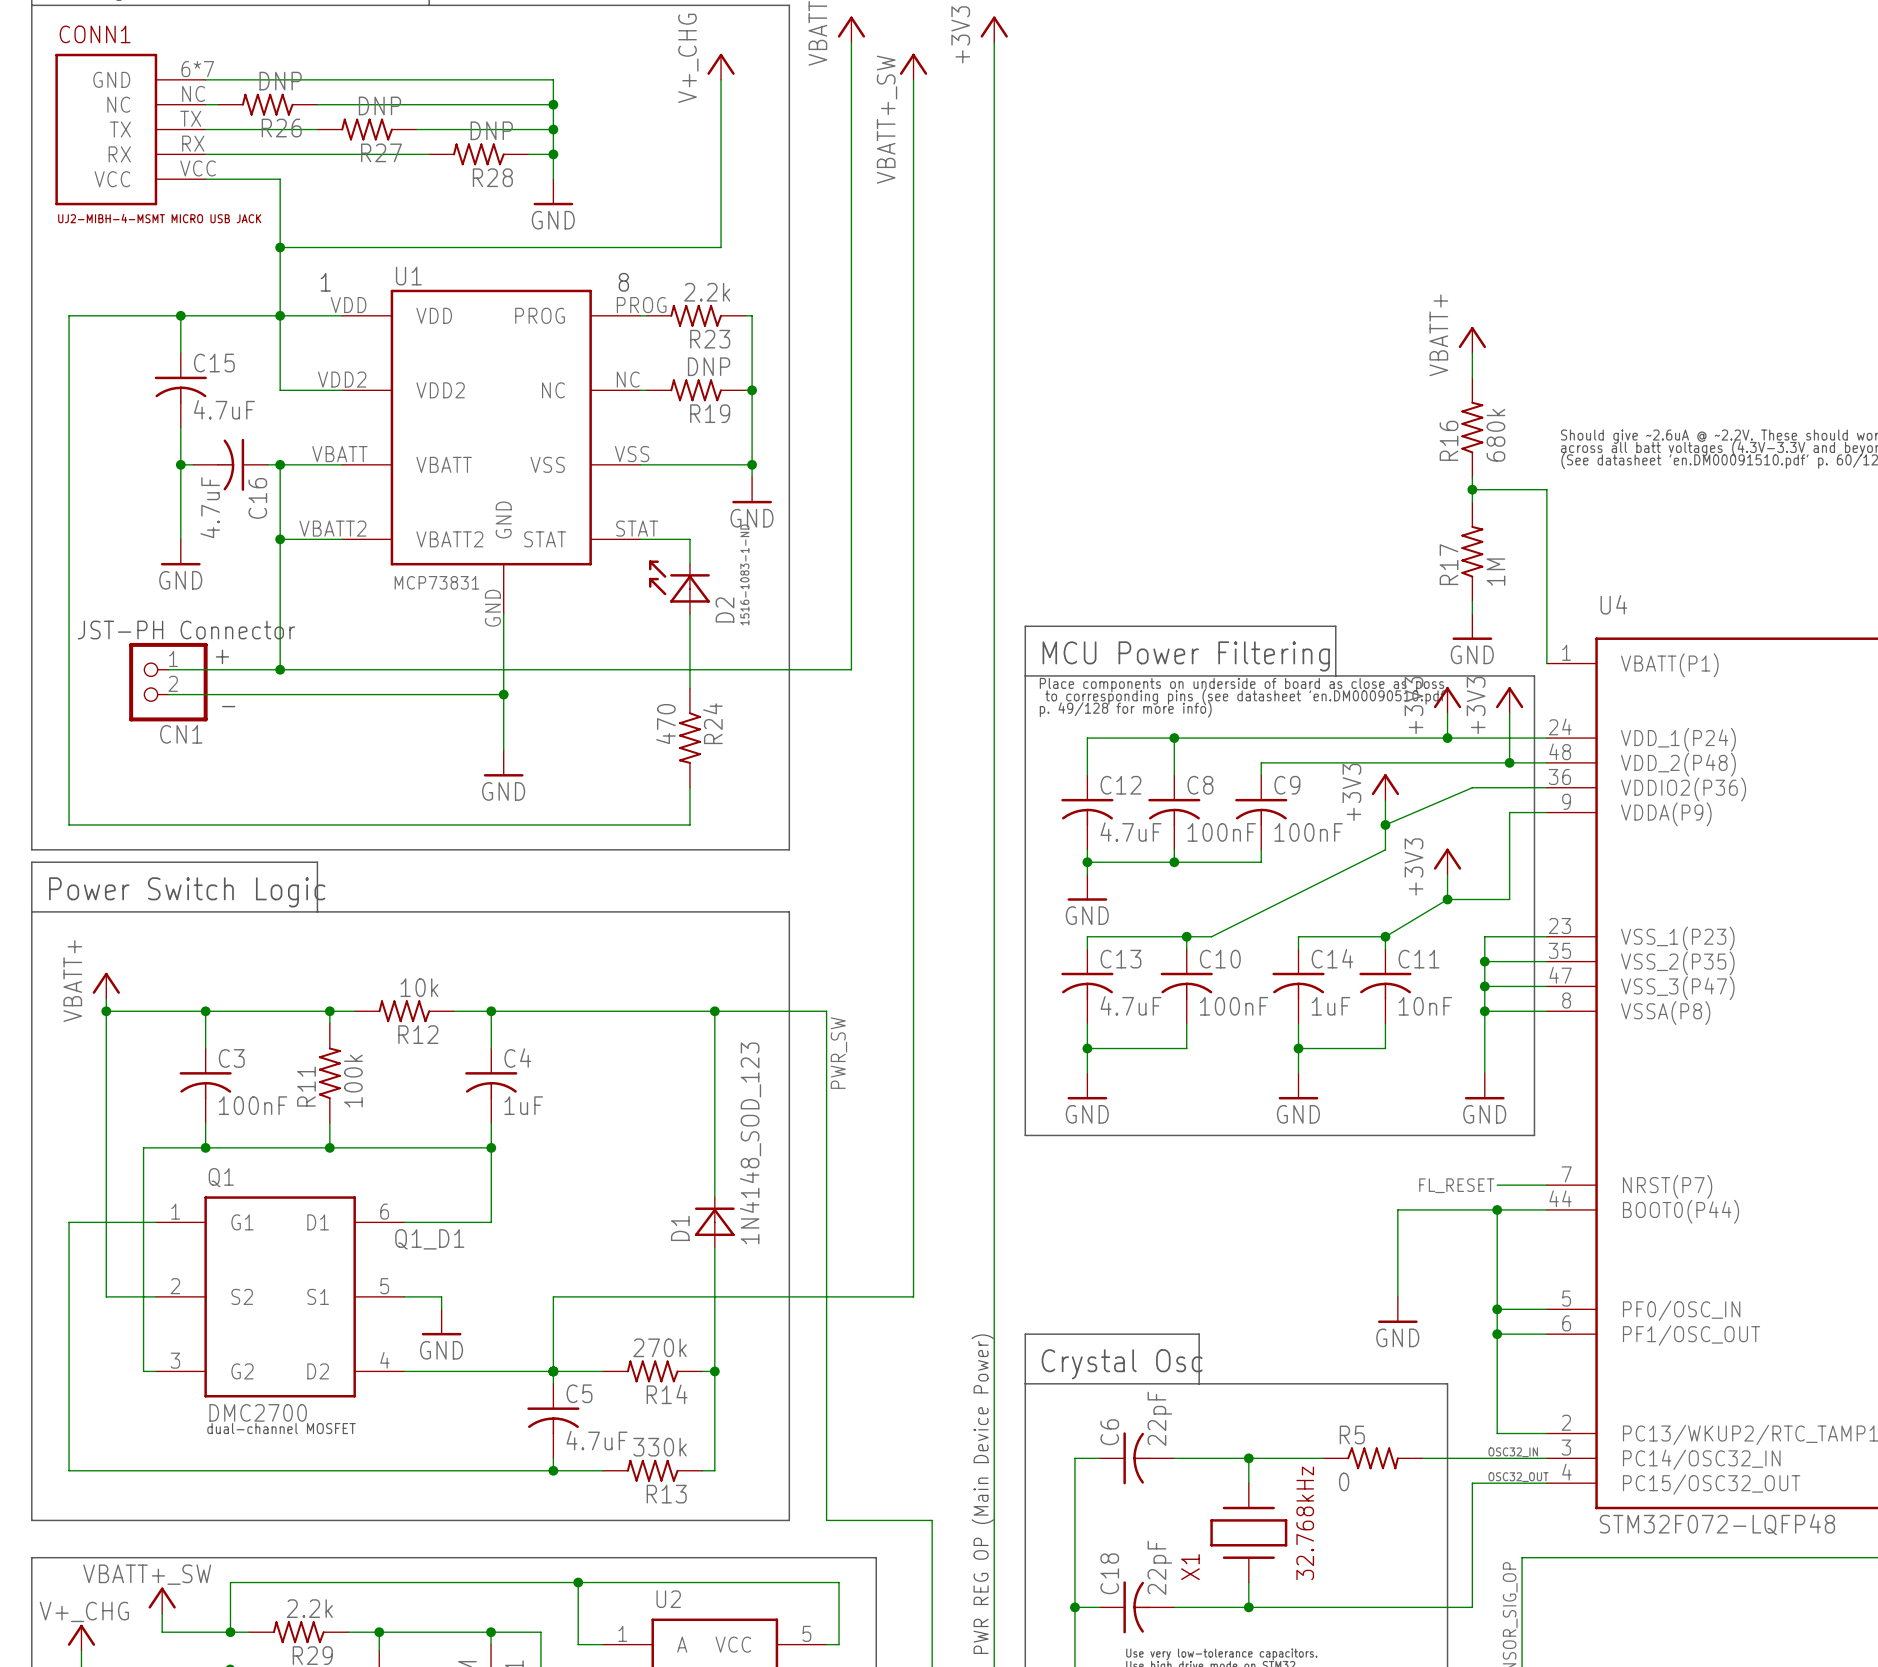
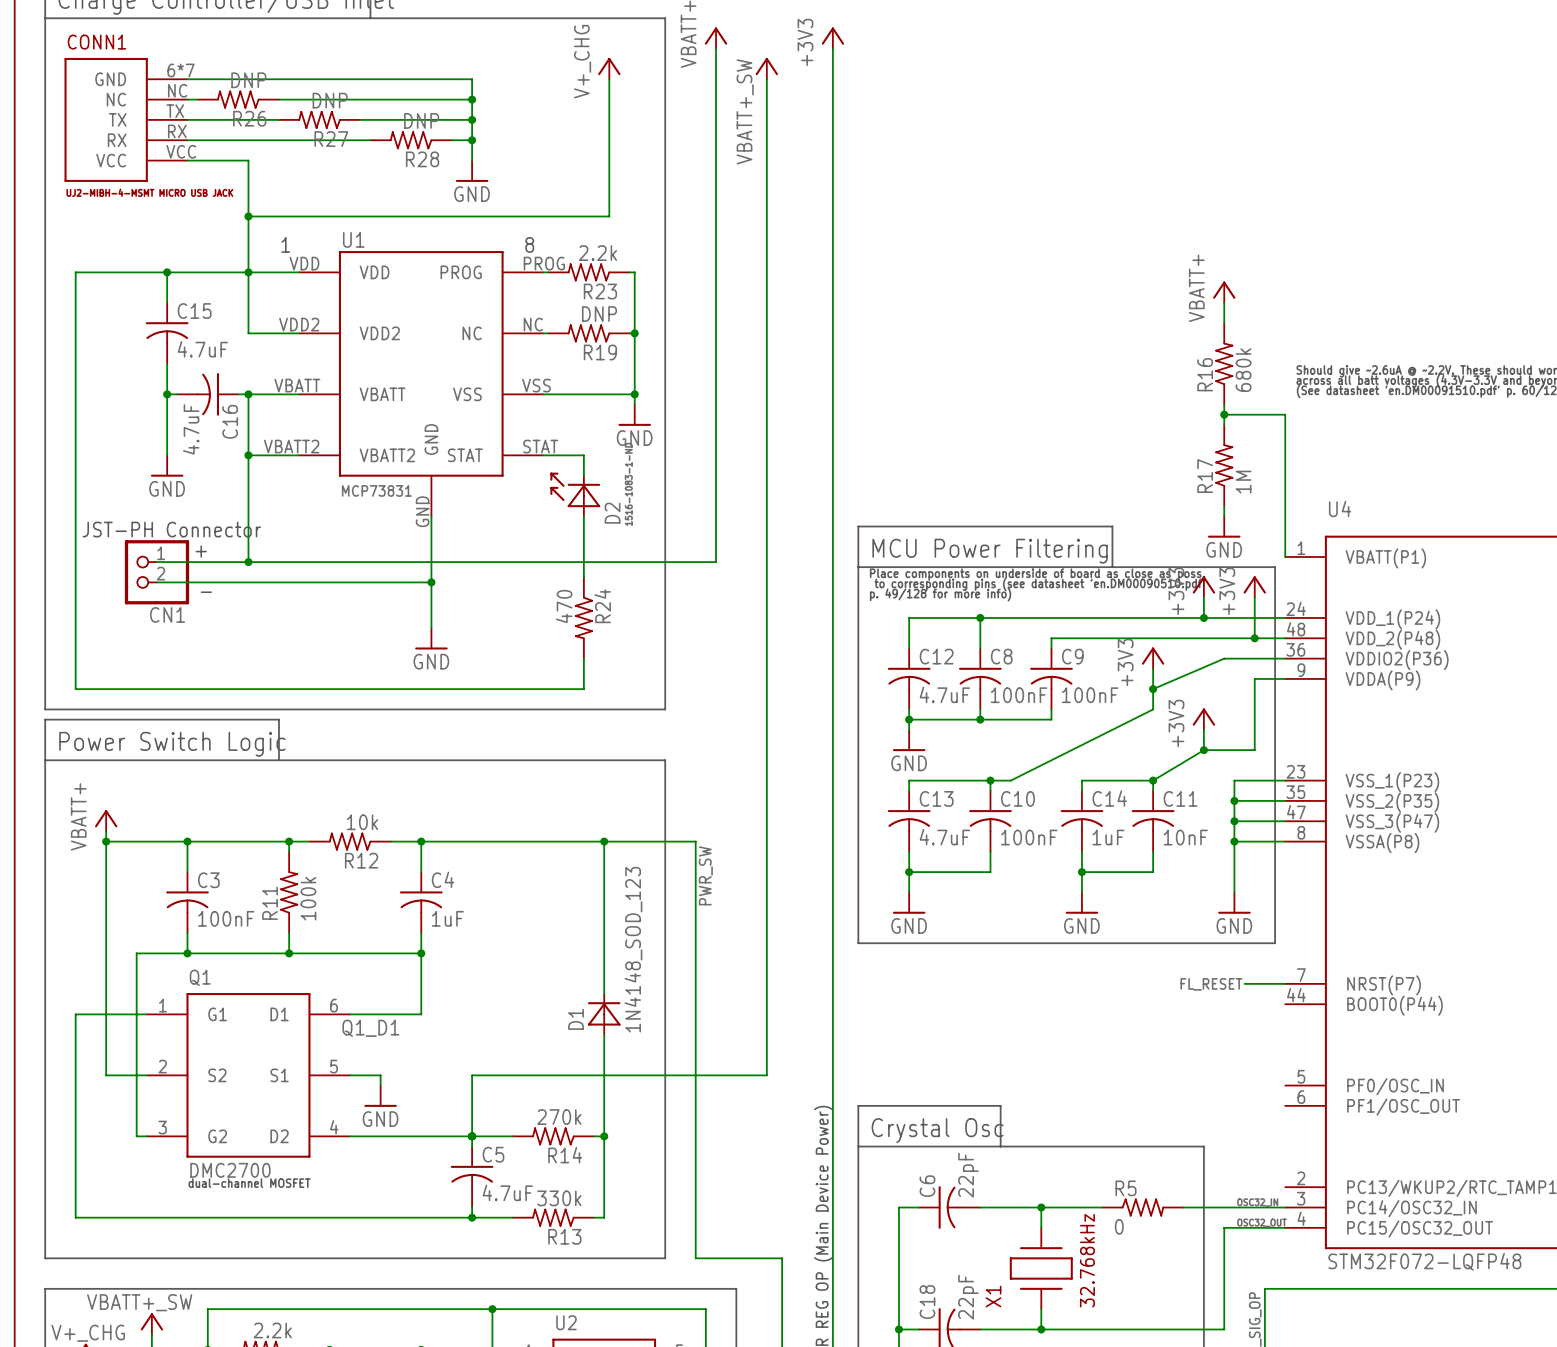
wire: (1497, 1209) (1497, 1433) (1546, 1433) -> none
junction: (1497, 1209) -> none
wire: (1546, 1209) (1397, 1209) (1397, 1296) -> none
power symbol: GND (1397, 1309) -> none
wire: (1497, 1309) (1546, 1309) -> none
junction: (1497, 1309) -> none
wire: (1497, 1334) (1546, 1334) -> none
junction: (1497, 1334) -> none

